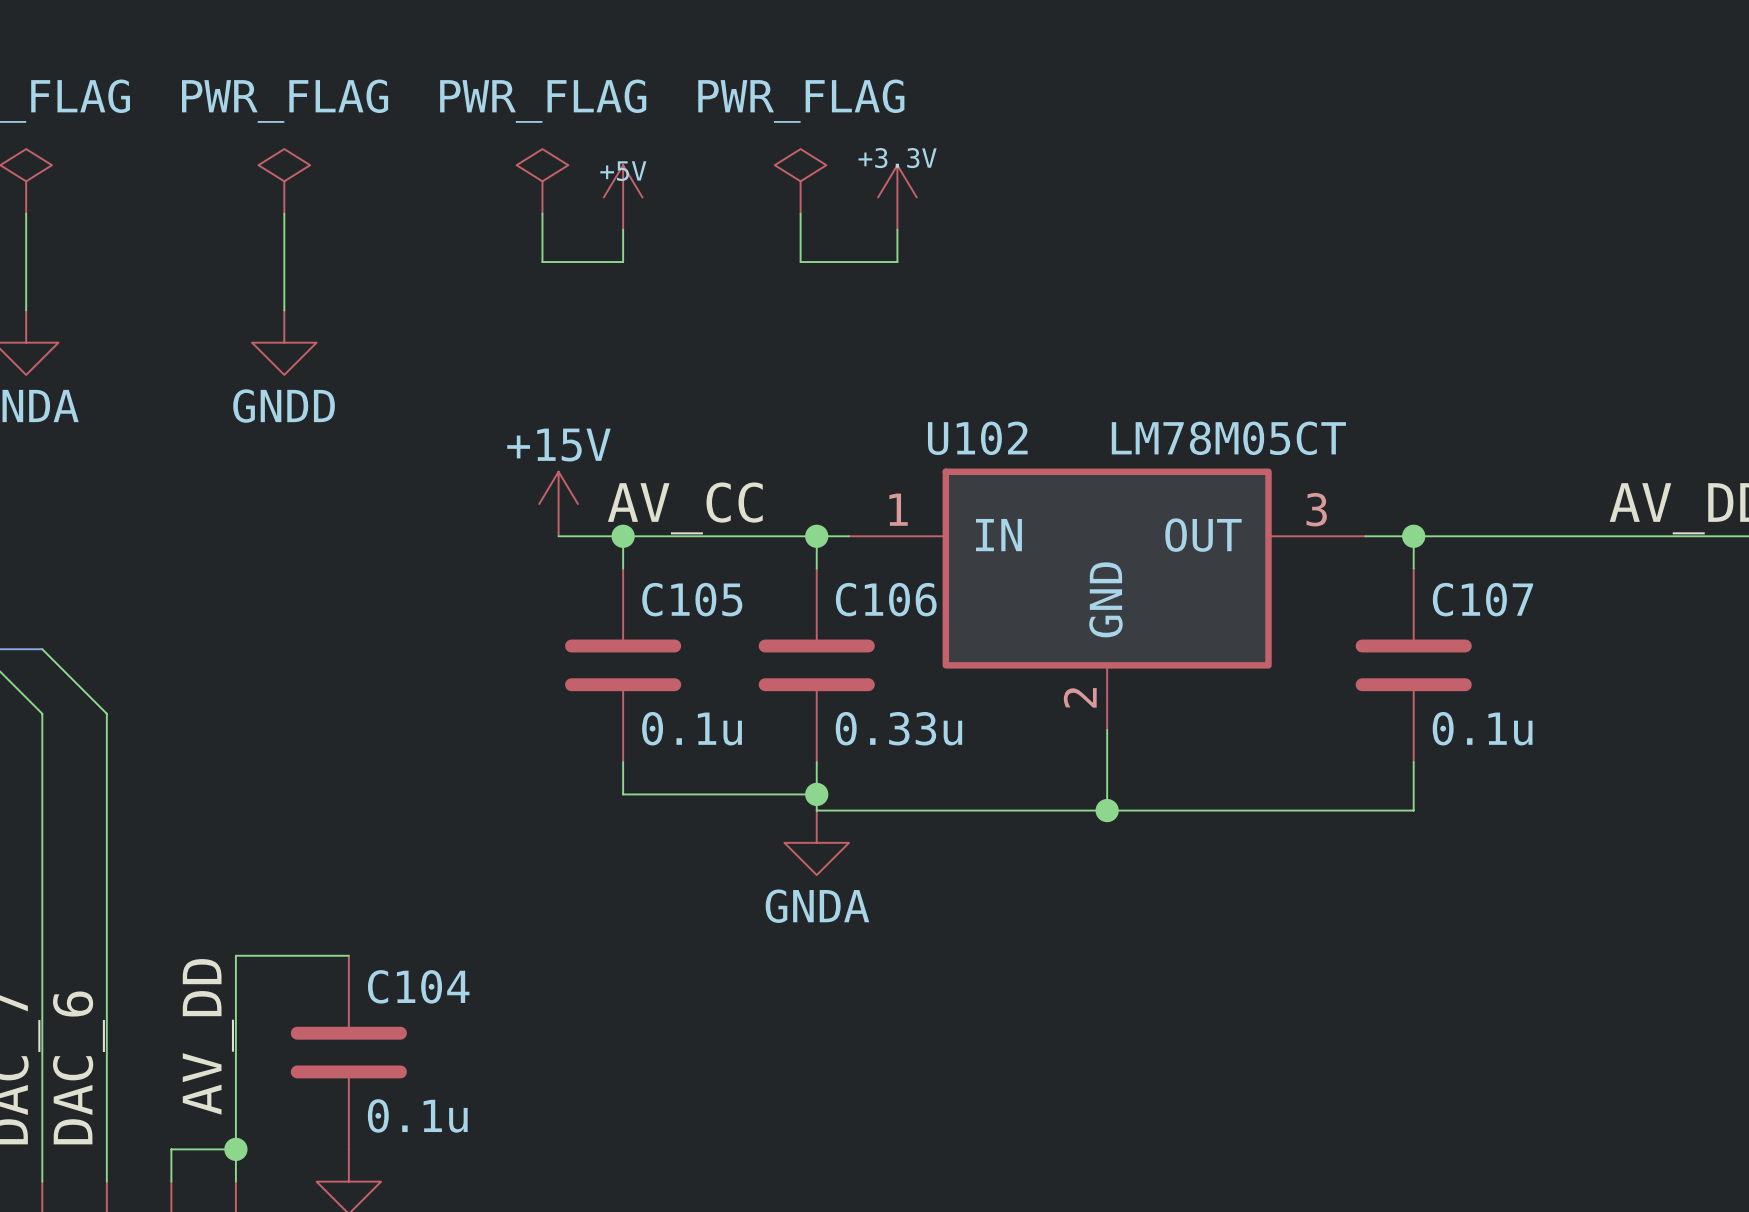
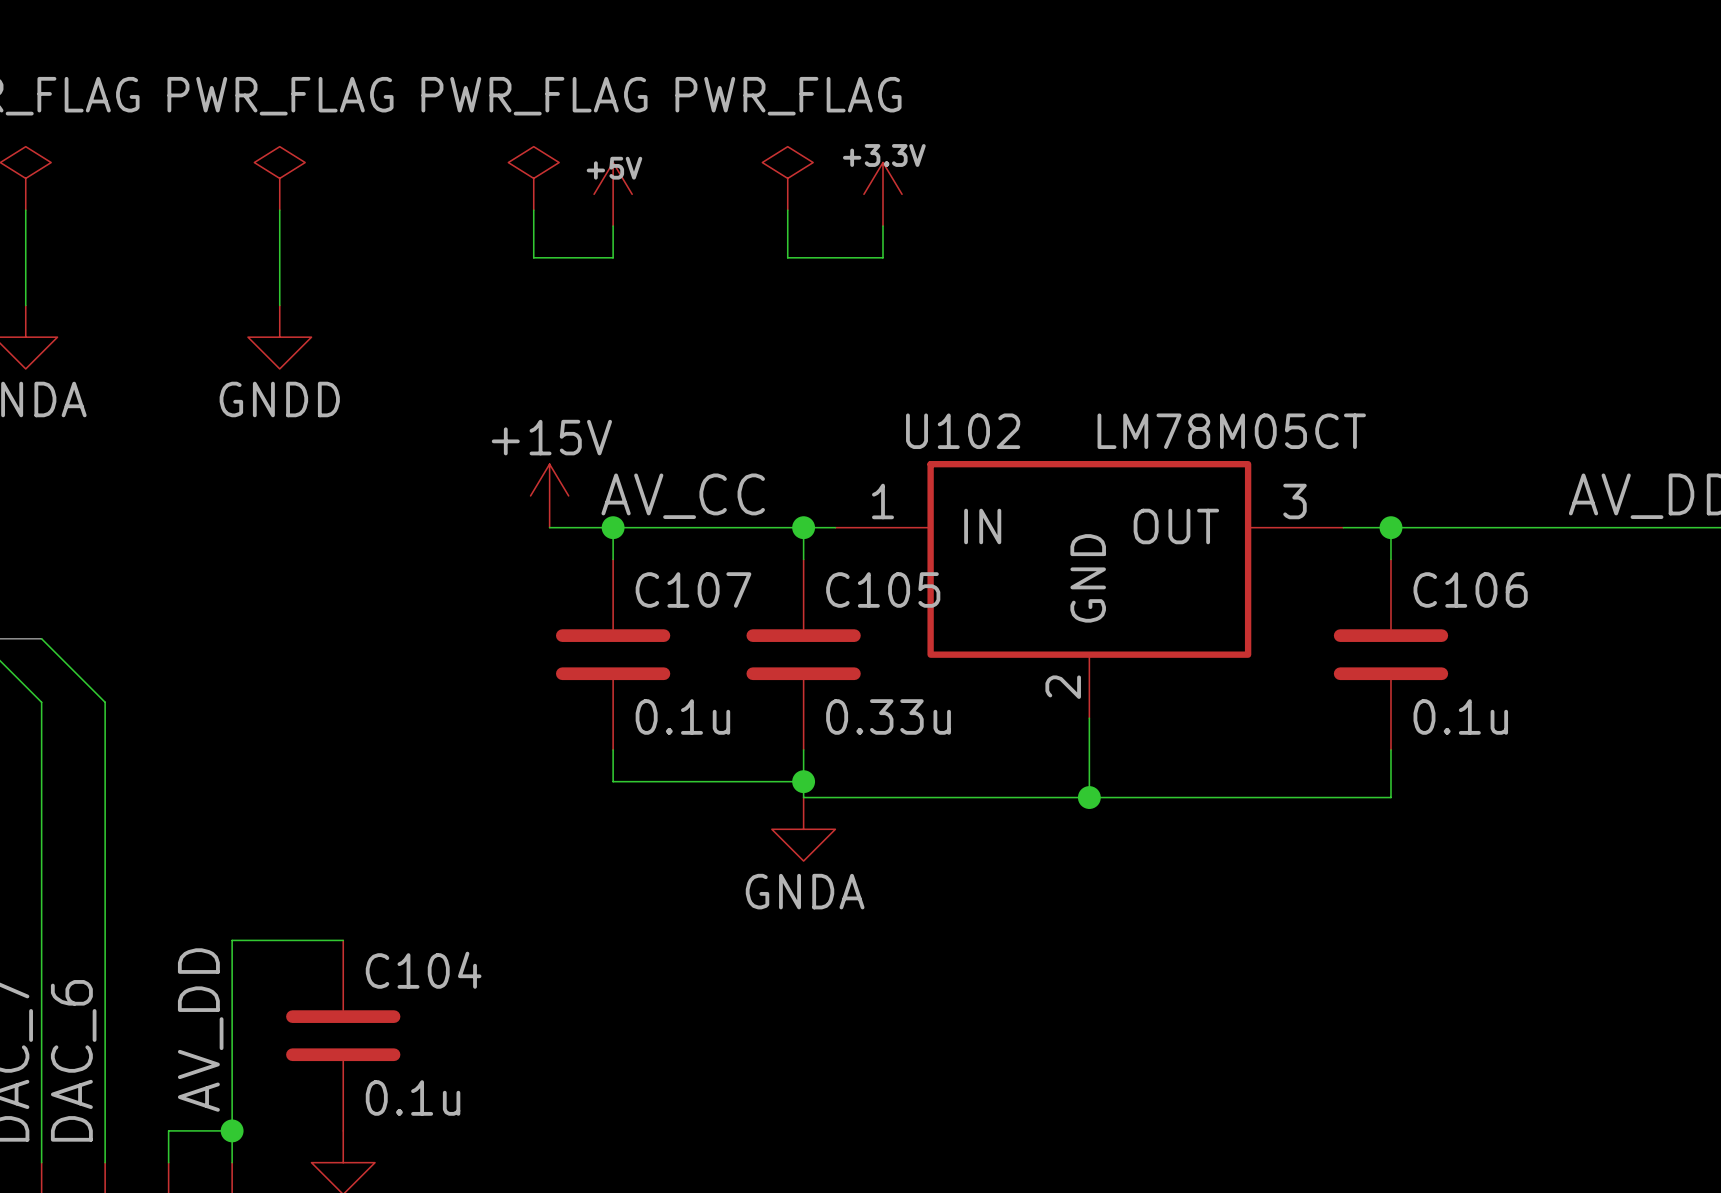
C105 name: C105 (692, 599) -> C107 (693, 589)
C106 name: C106 (886, 599) -> C105 (883, 589)
C107 name: C107 (1482, 599) -> C106 (1470, 589)

